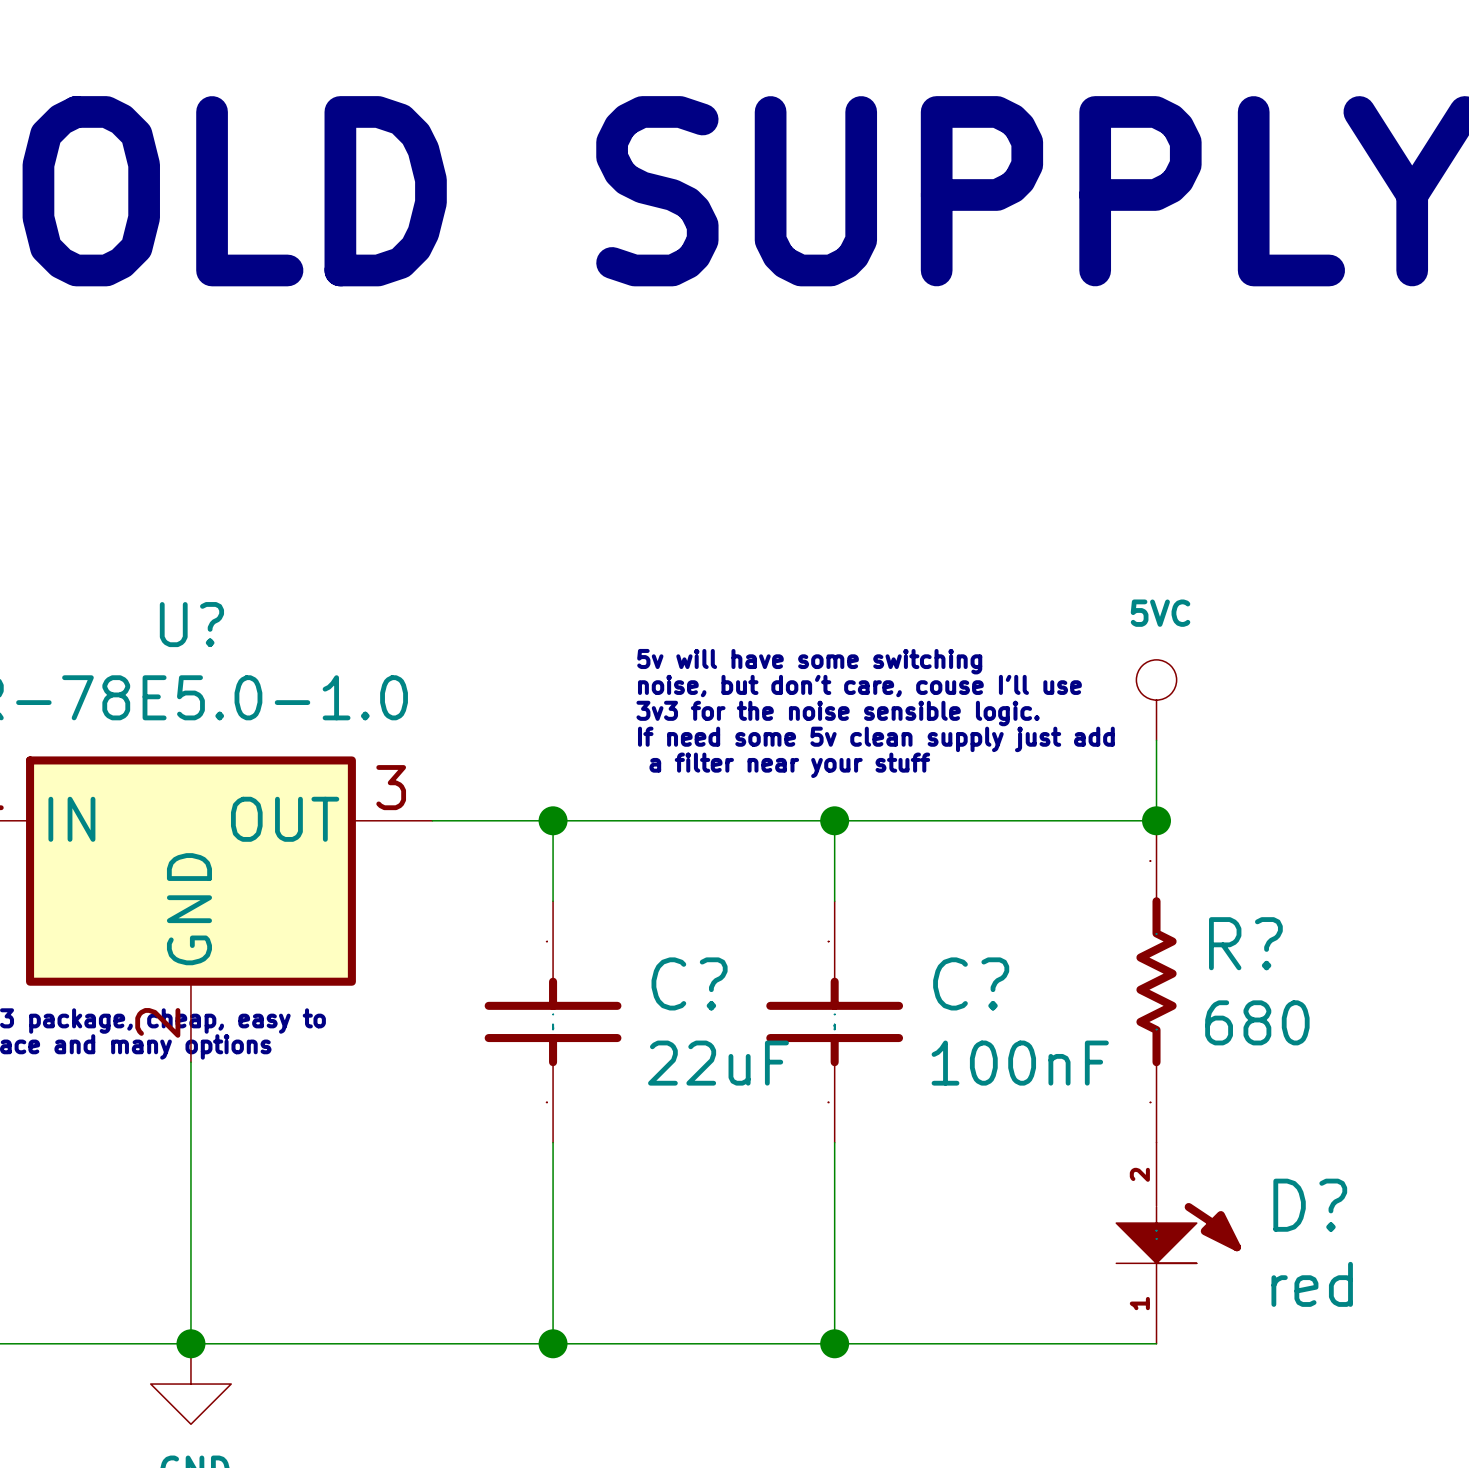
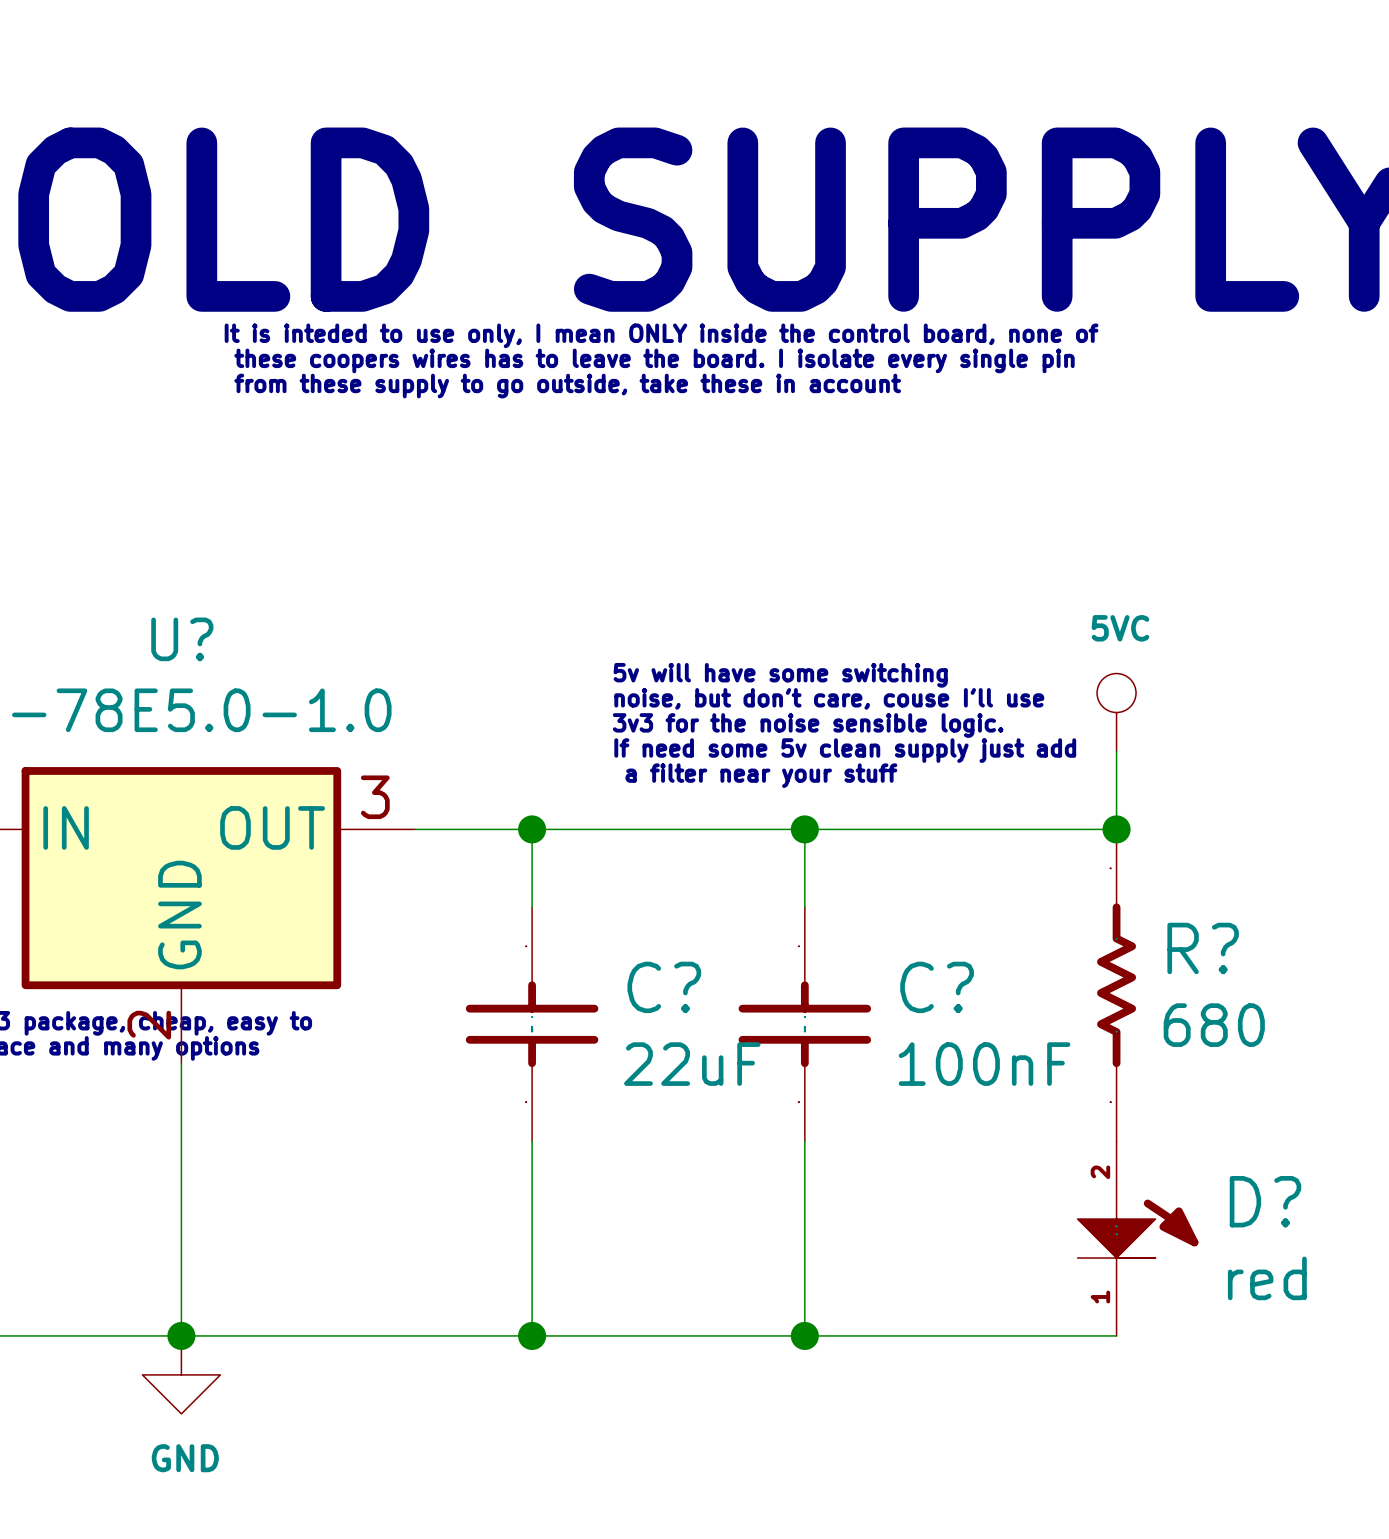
text: none -> It is inteded to use only, I mean ONLY inside the control board, none of (661, 335)
text: none -> these coopers wires has to leave the board. I isolate every single pin (654, 360)
text: none -> from these supply to go outside, take these in account (567, 386)

